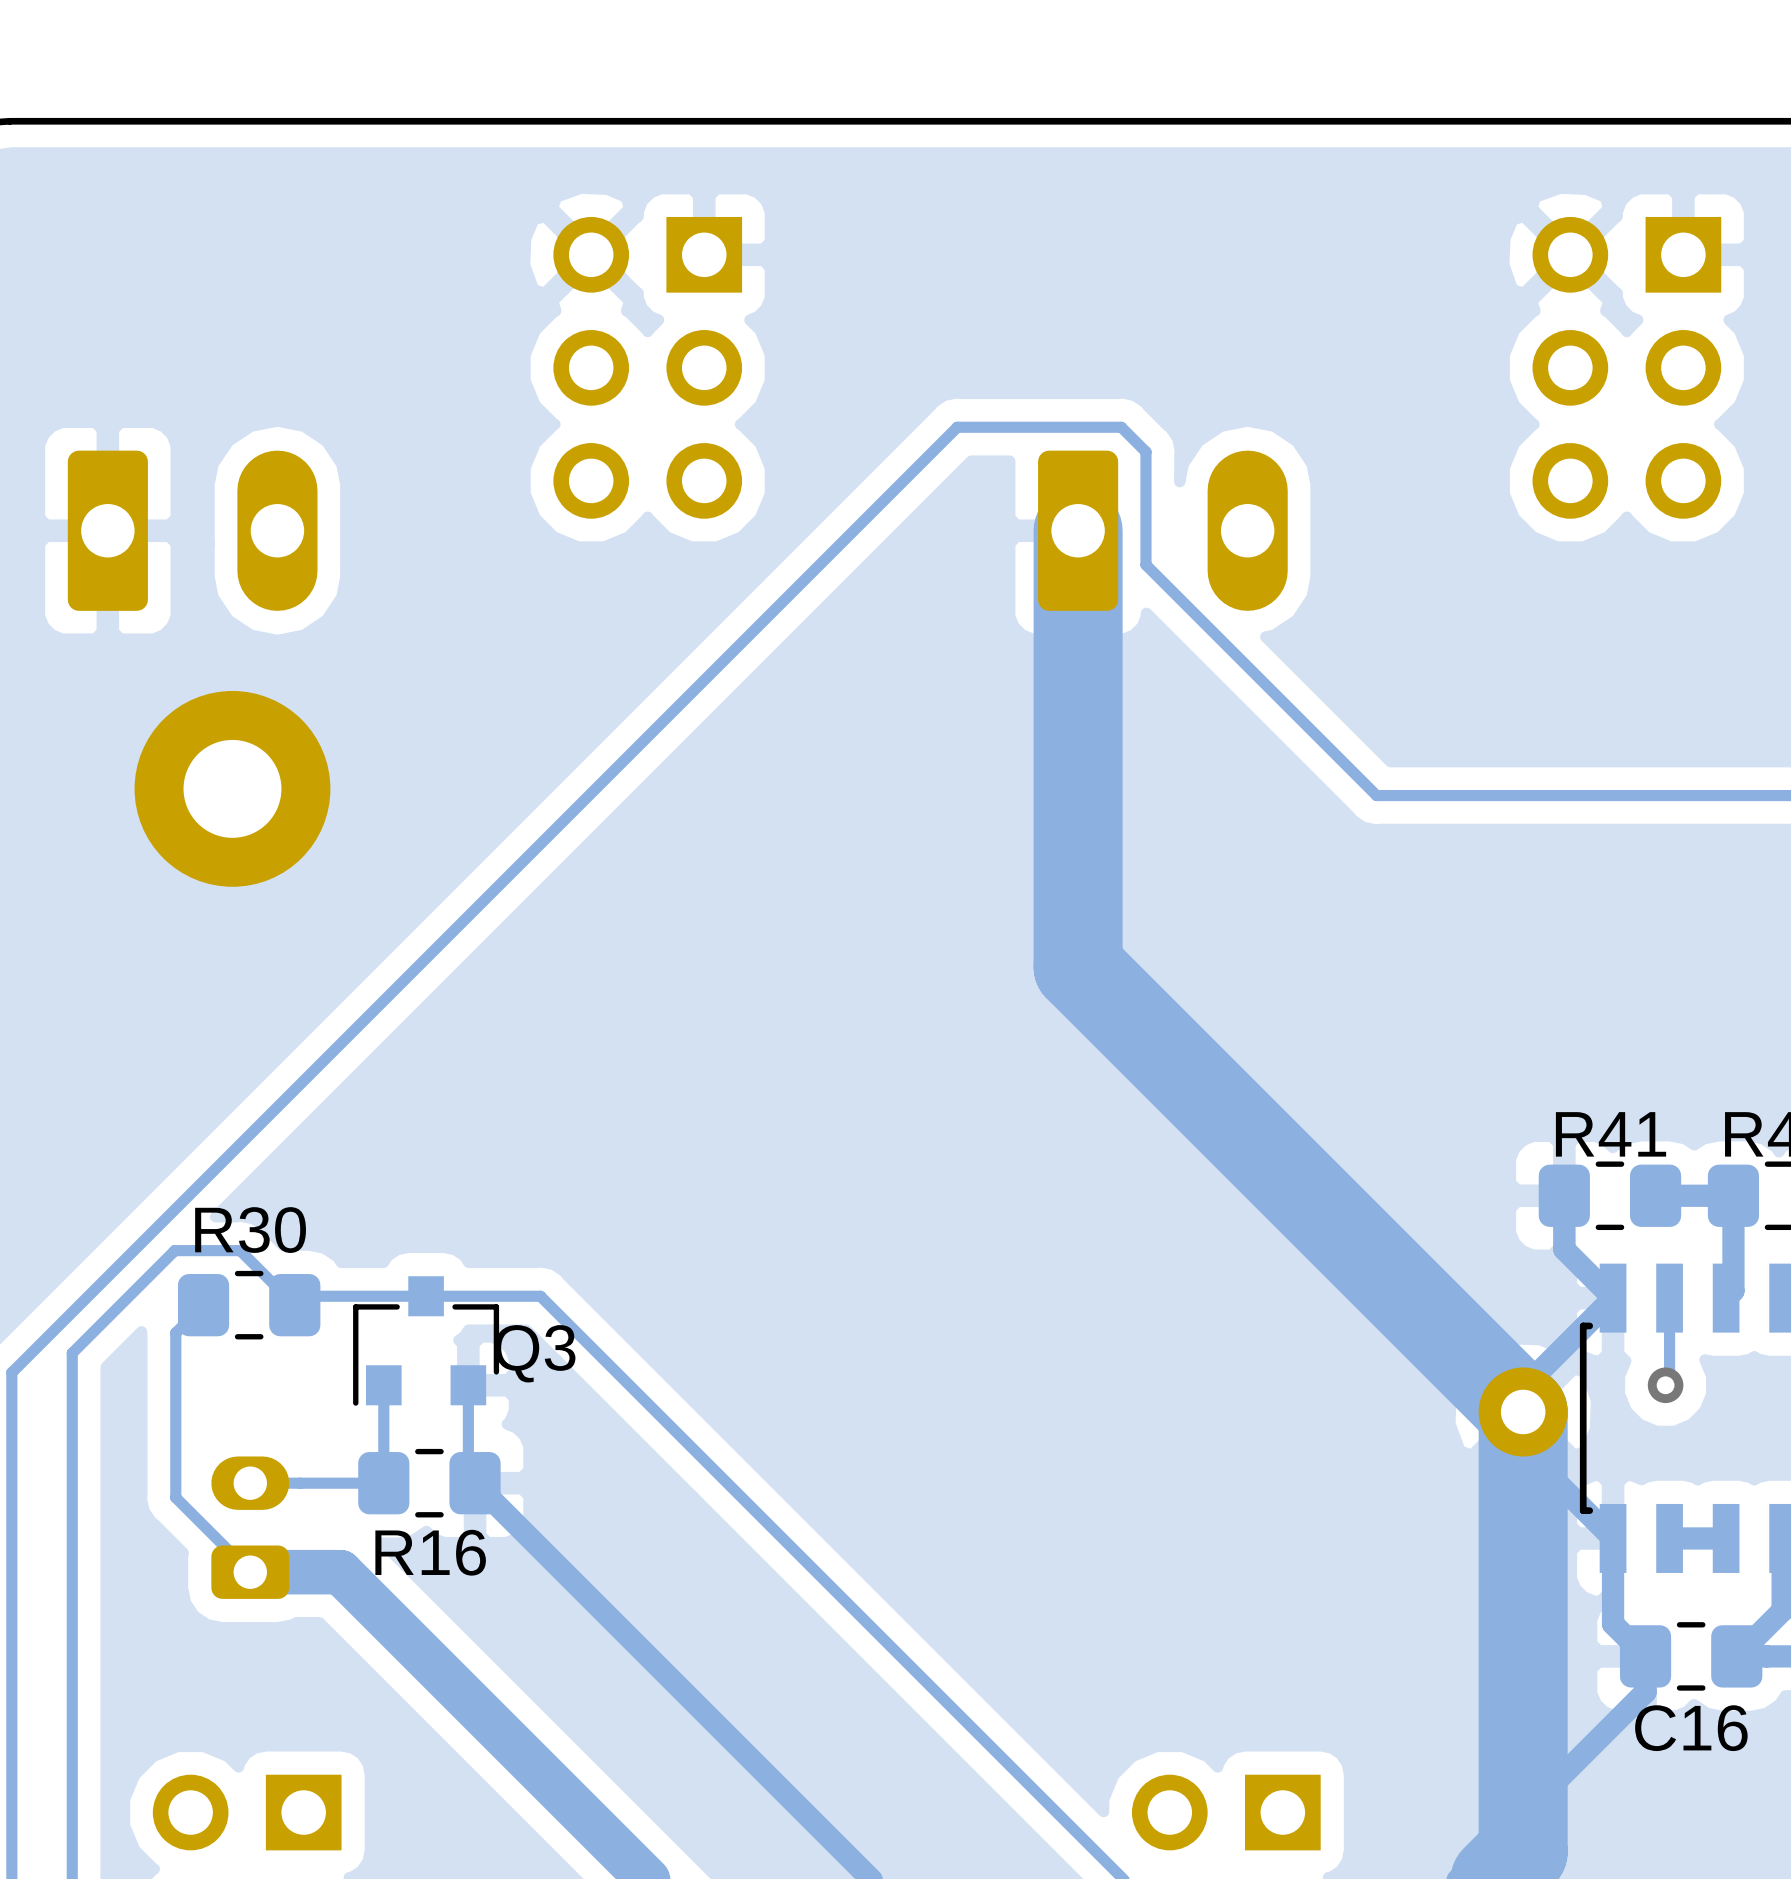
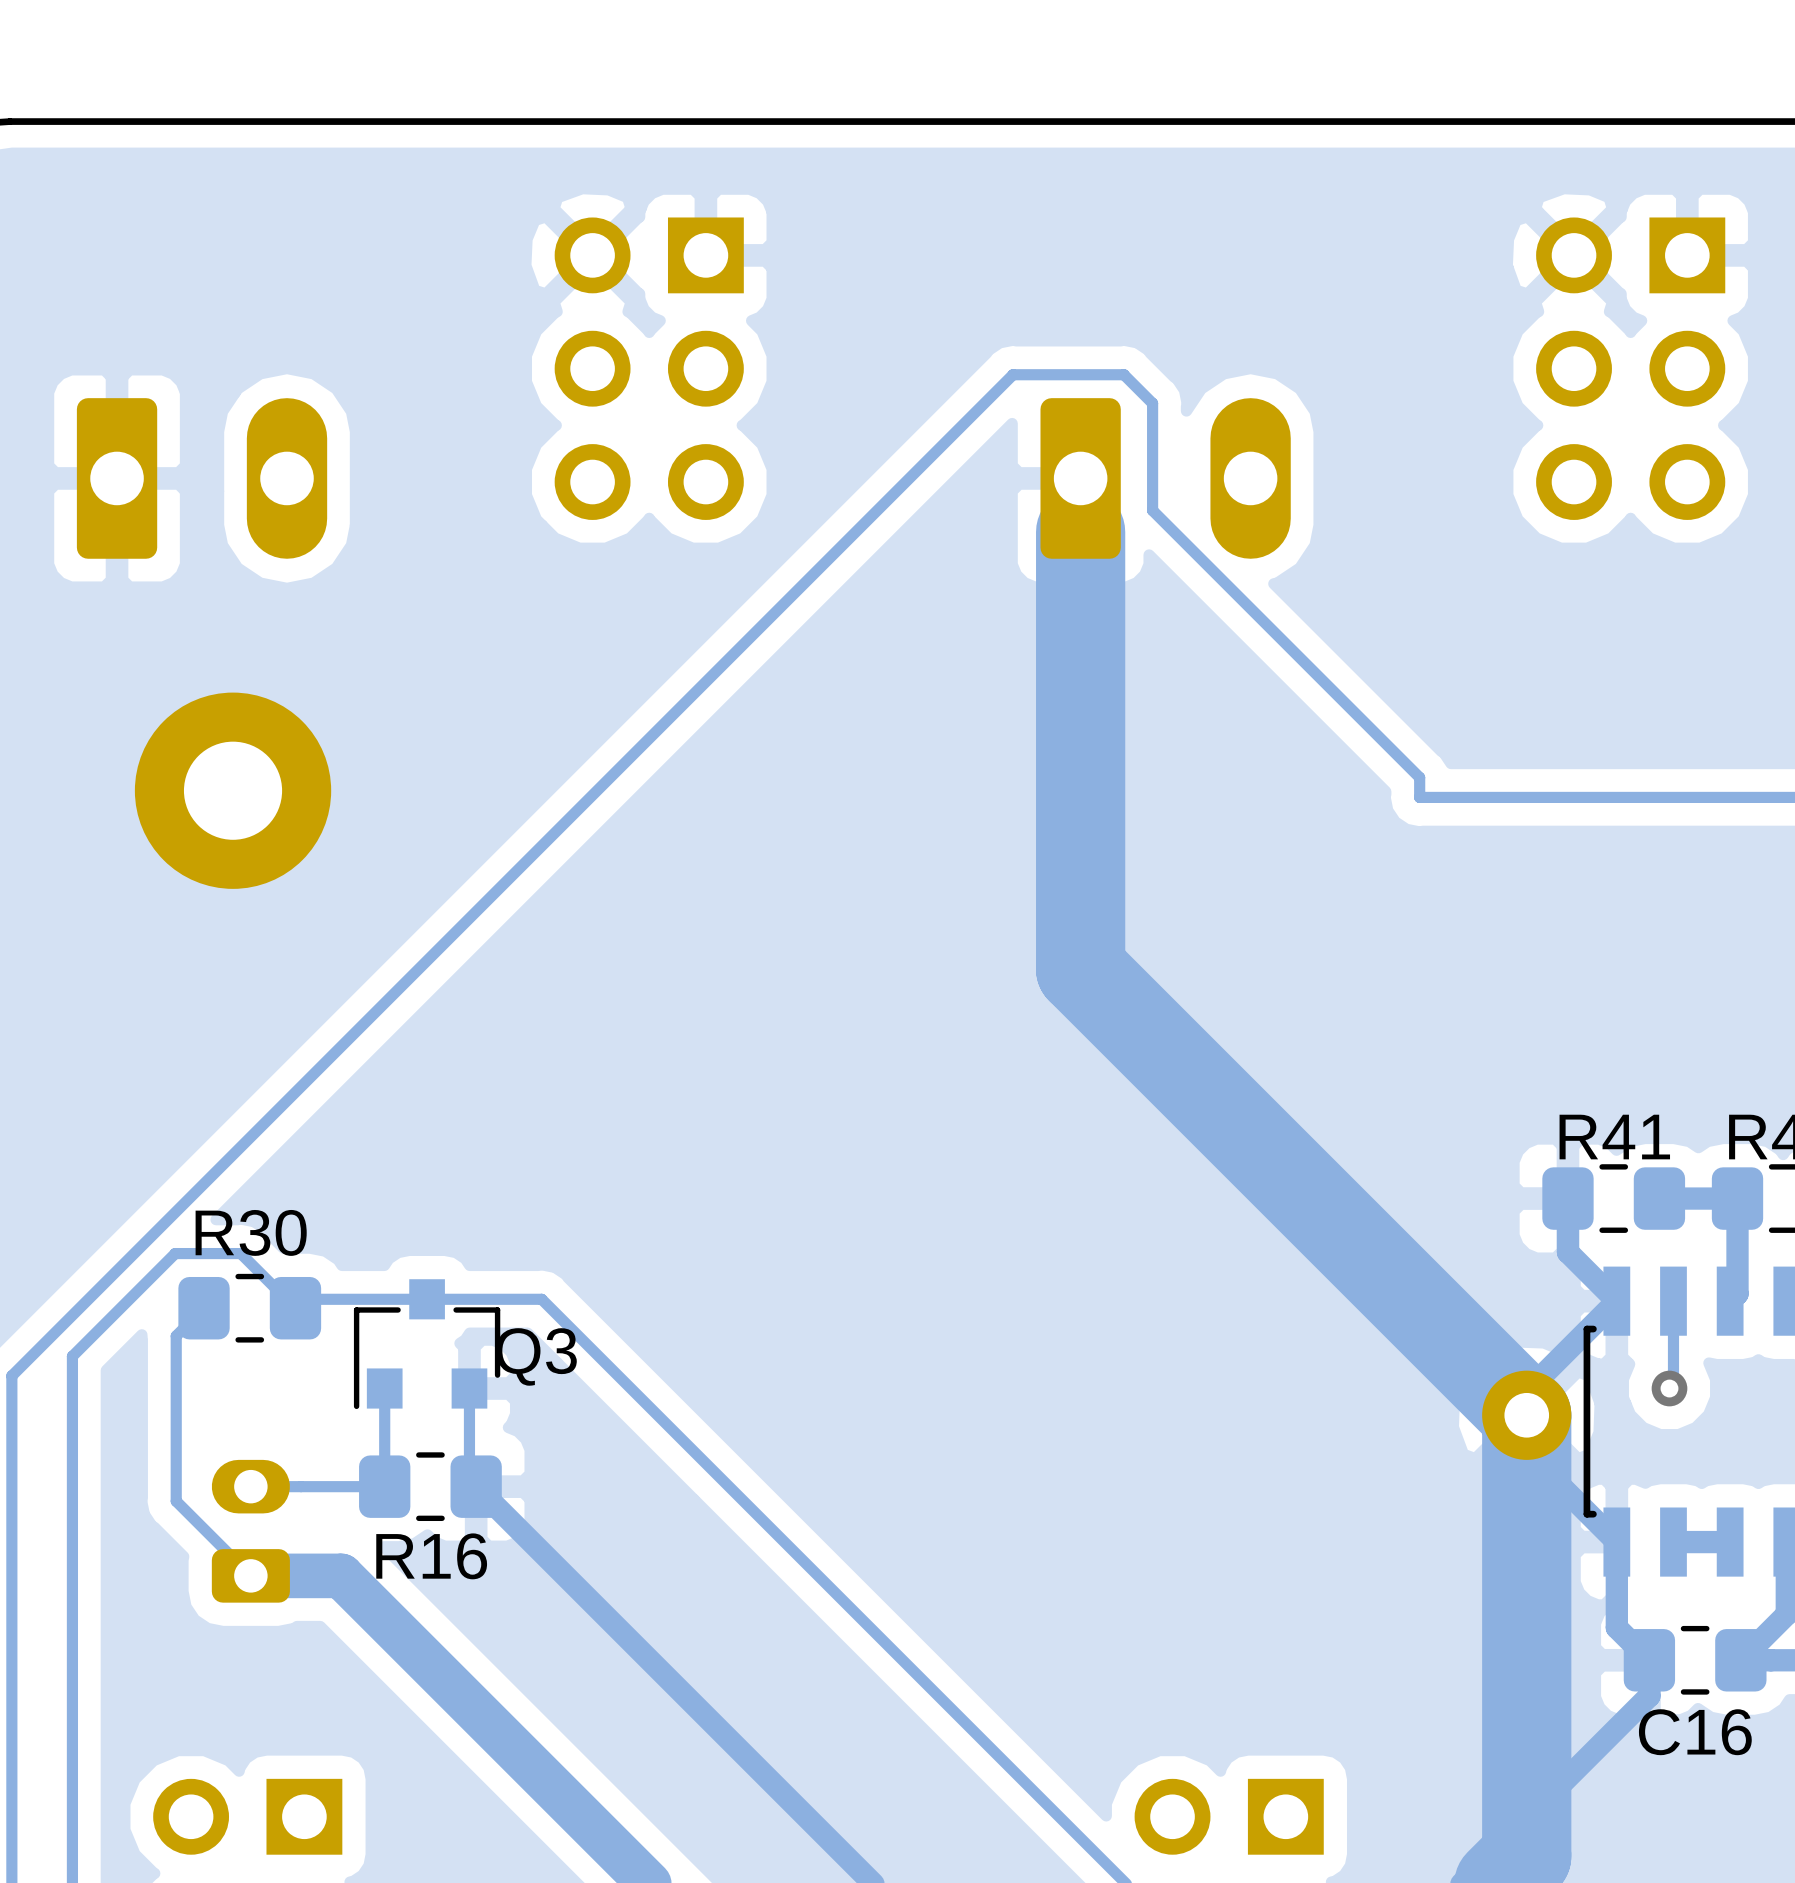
track: (957, 427) (1121, 427) (1145, 451) (1145, 564) (1376, 795) (1416, 795) -> (959, 428) (1013, 374) (1123, 374) (1152, 403) (1152, 510) (1419, 777) (1419, 797)
part position: (192, 530) -> (202, 478)
part position: (1162, 530) -> (1165, 478)

